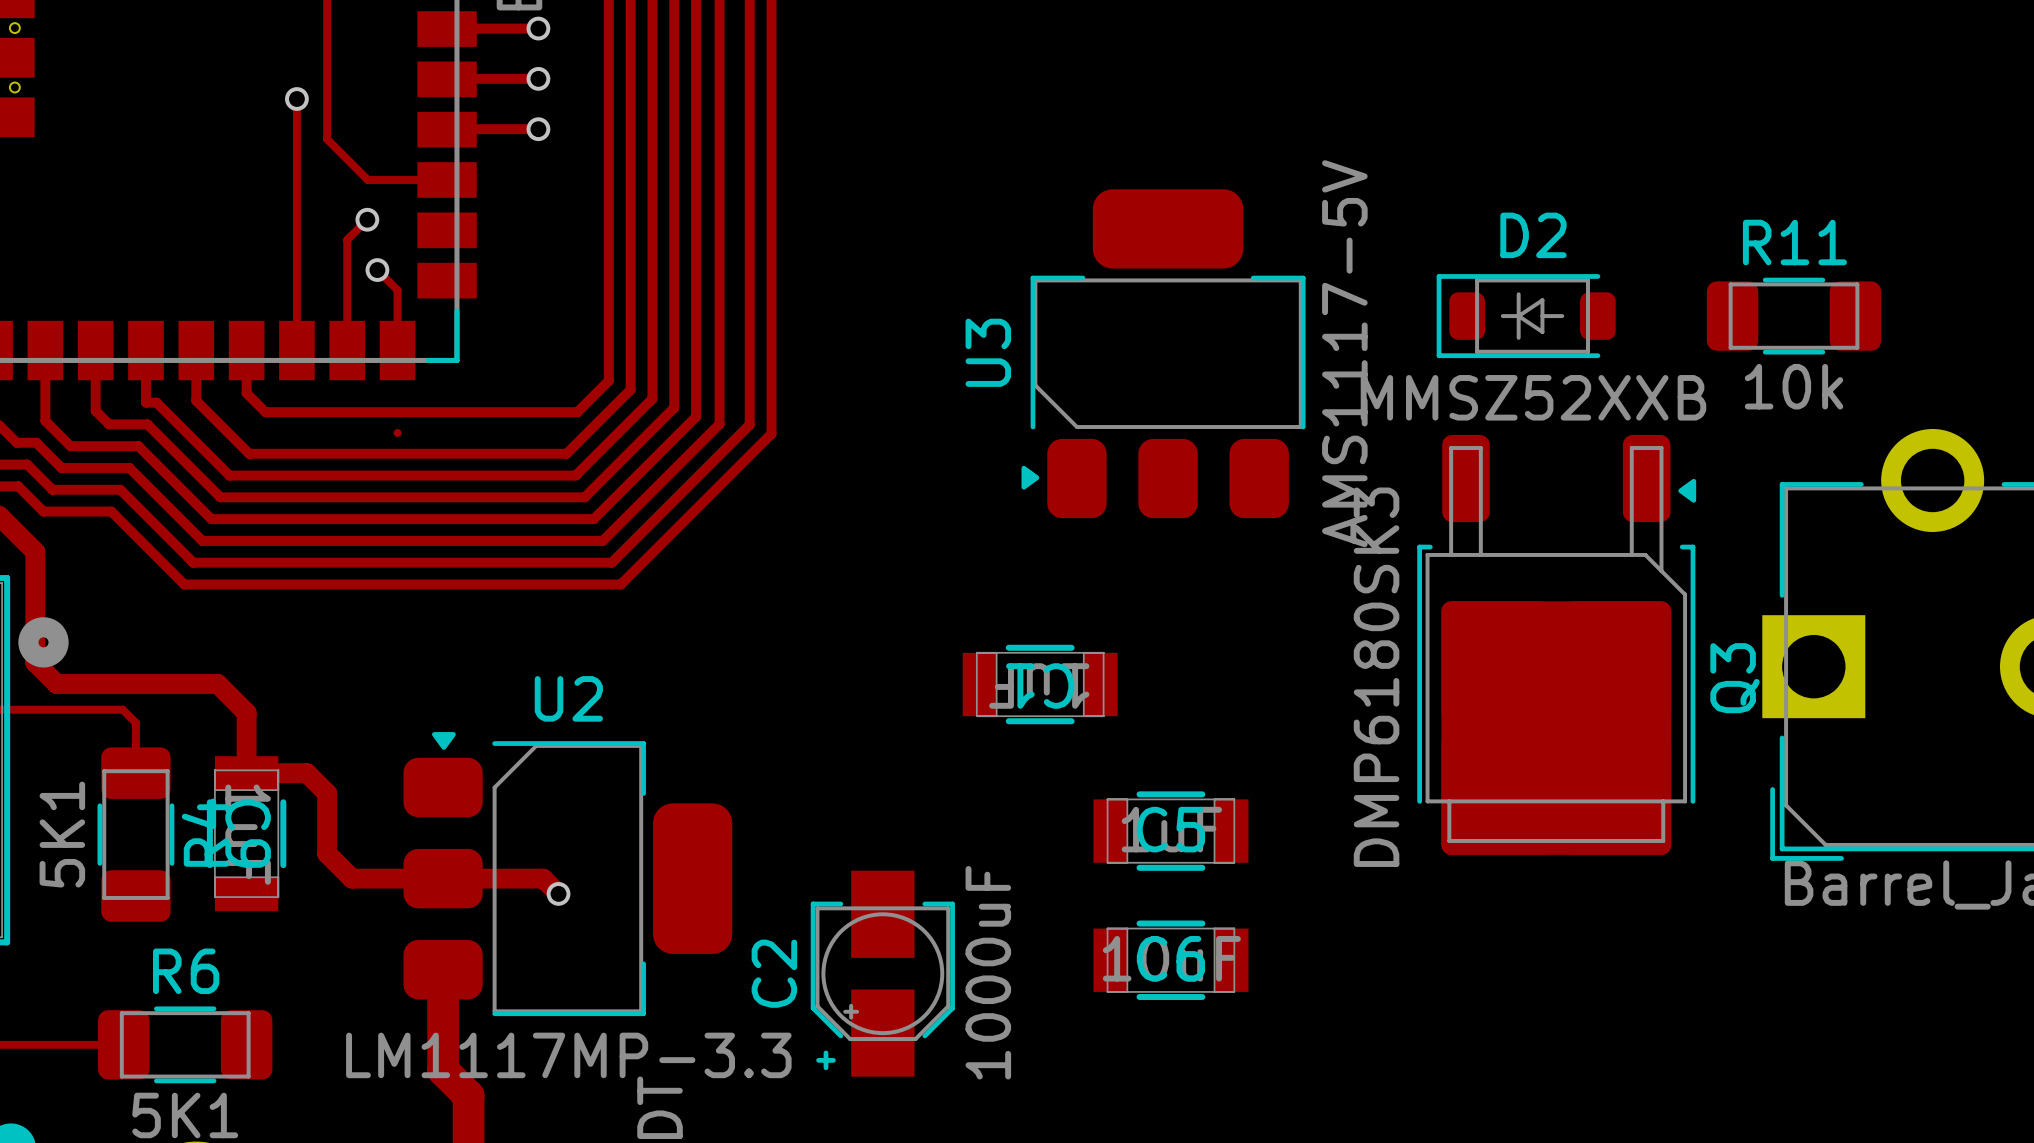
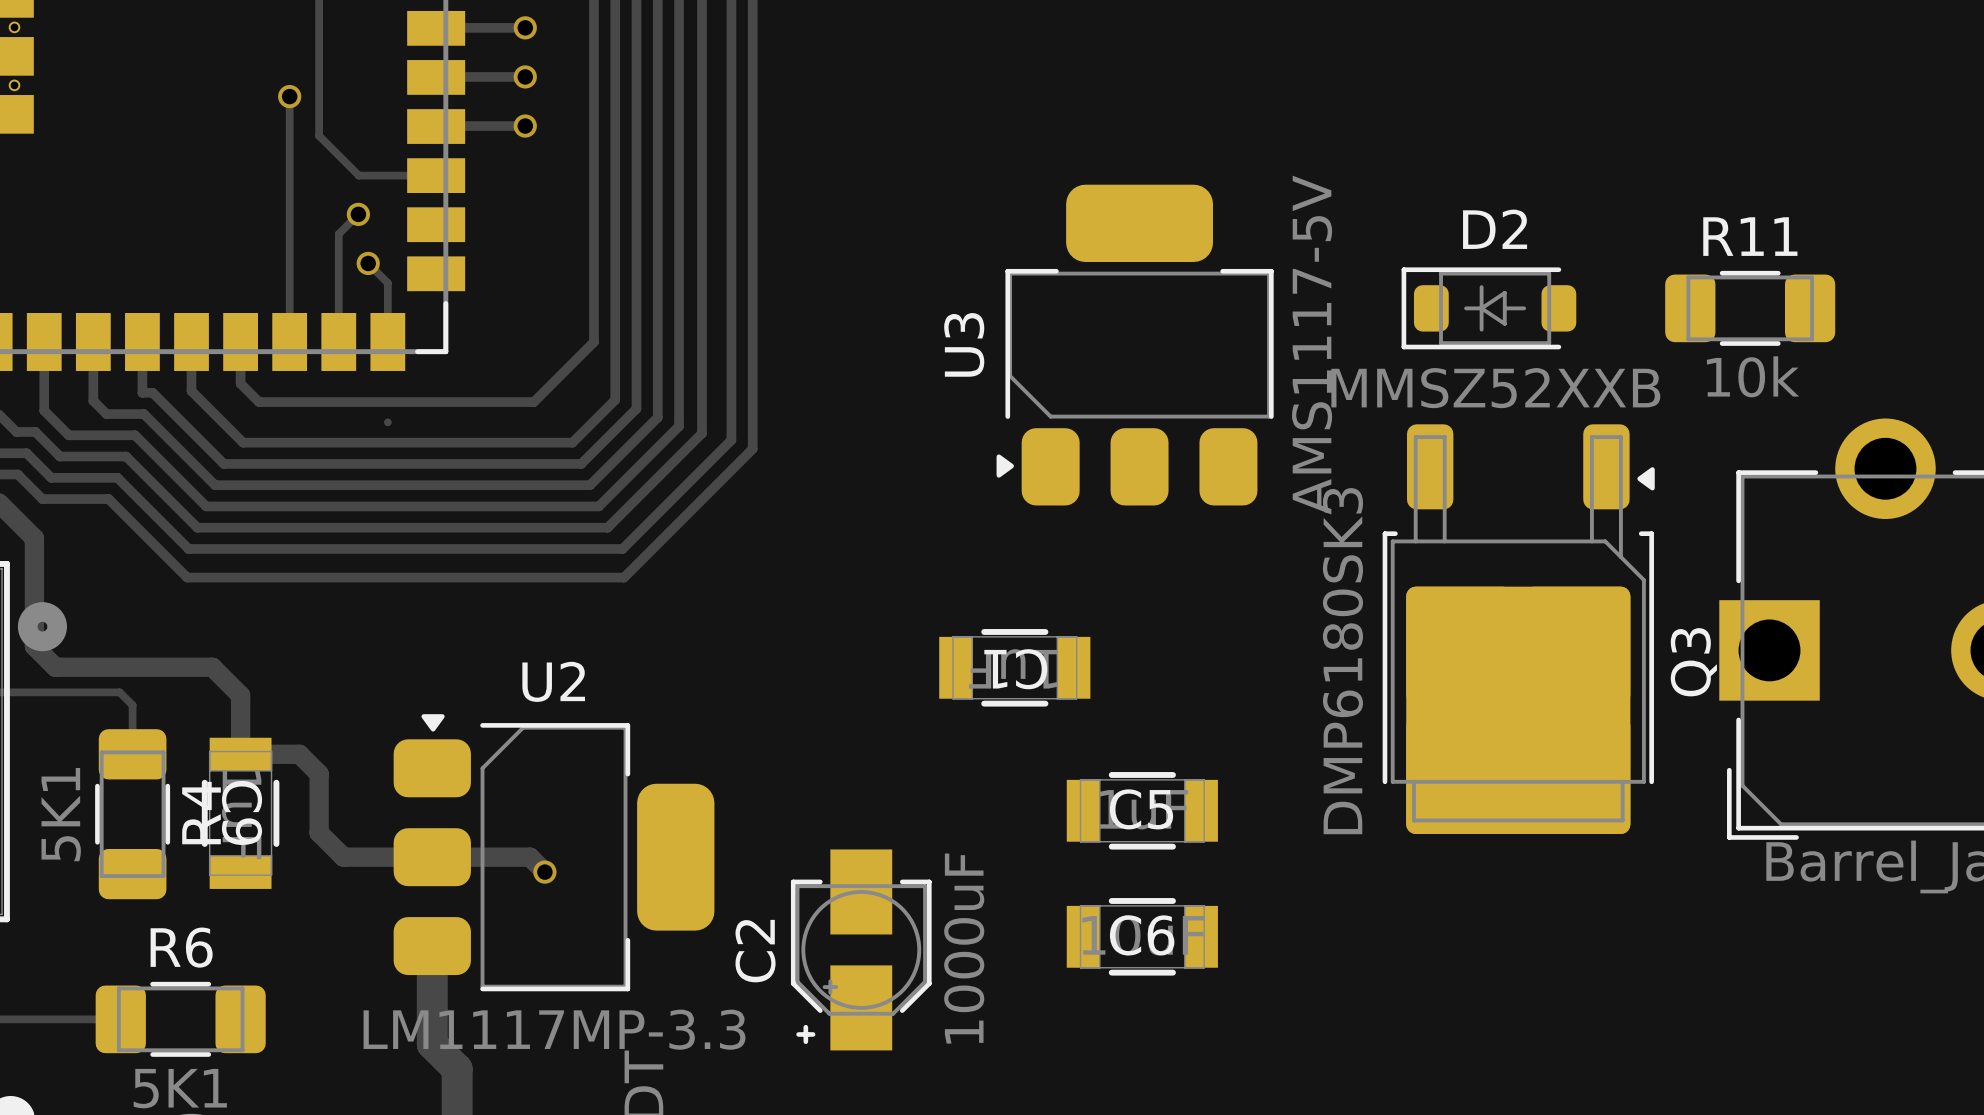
track: (608, 350) (608, 380) (577, 412) (547, 412) -> (593, 341) (533, 402)
track: (630, 389) (566, 453) -> (615, 380) (615, 399) (572, 442) (552, 442)
track: (652, 398) (575, 475) -> (636, 389) (636, 408) (581, 463) (561, 463)
track: (674, 407) (584, 497) -> (657, 397) (657, 417) (590, 485) (570, 485)
track: (696, 416) (593, 519) -> (679, 406) (679, 426) (598, 506) (579, 506)
track: (719, 424) (602, 540) -> (701, 413) (701, 433) (607, 527) (588, 527)
track: (749, 424) (611, 562) -> (731, 414) (731, 440) (622, 548) (596, 548)
track: (771, 433) (620, 584) (184, 584) -> (752, 423) (752, 448) (624, 577) (187, 577) (179, 570)

